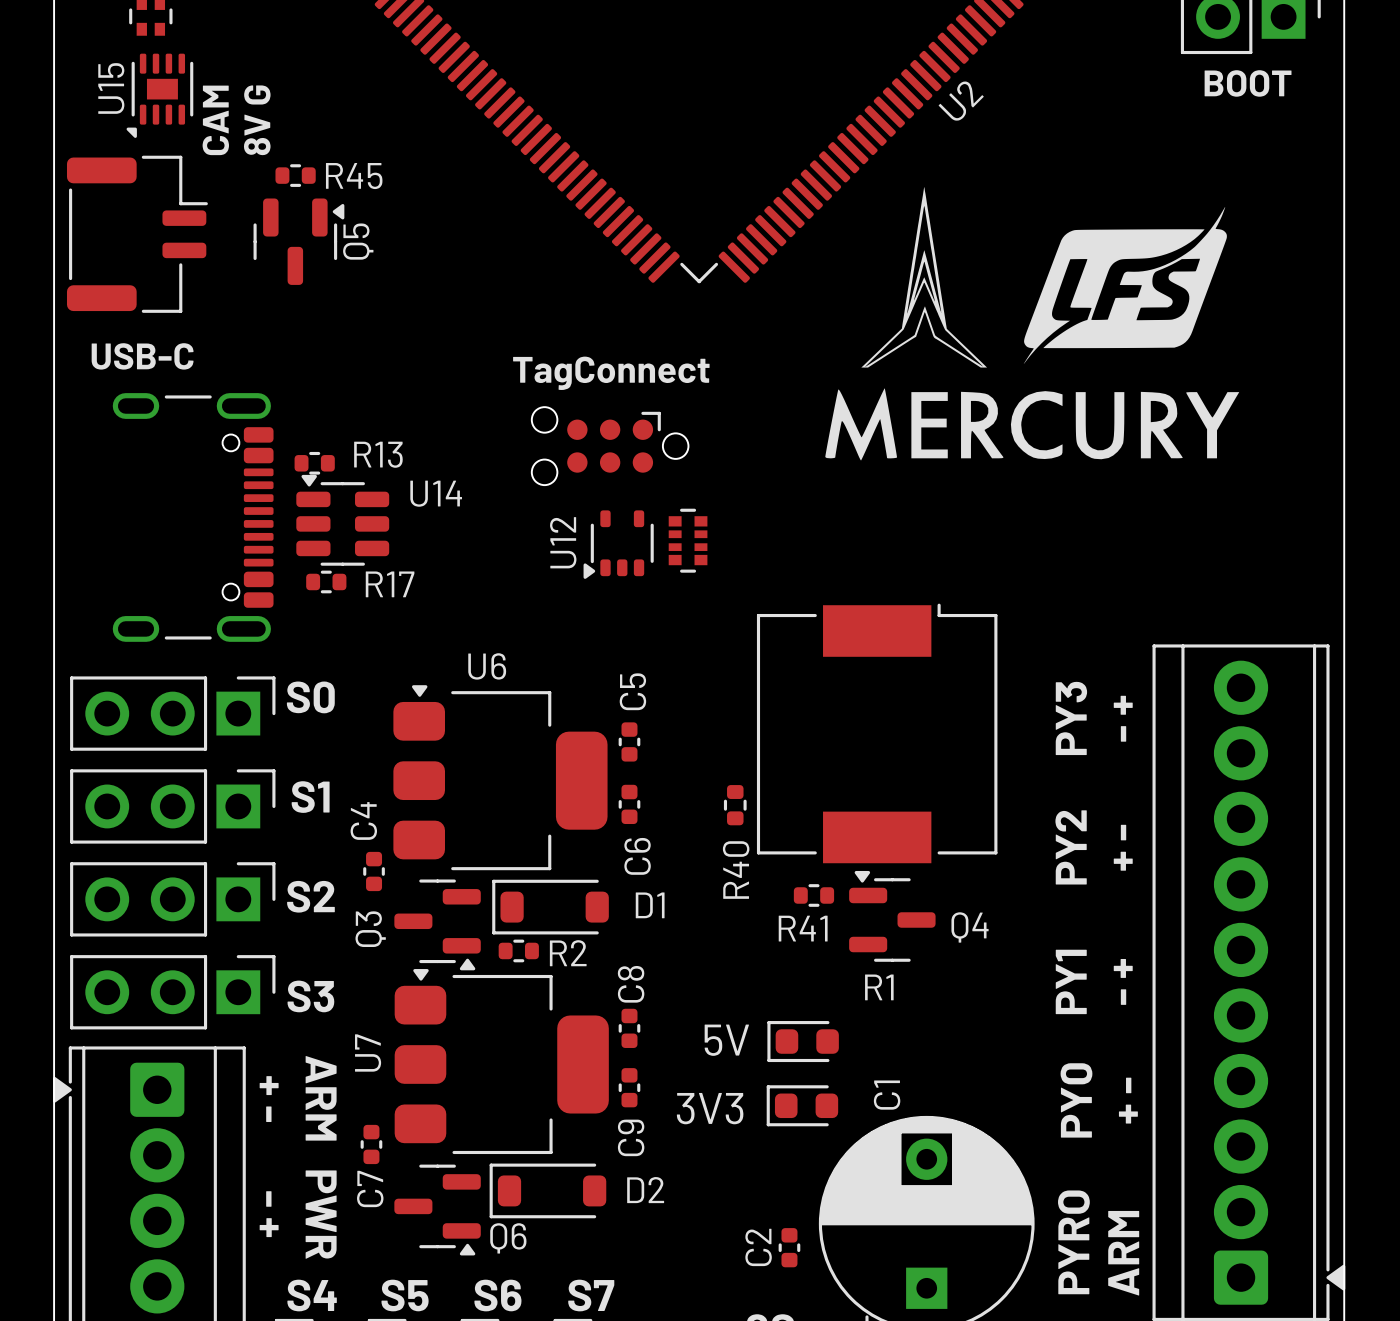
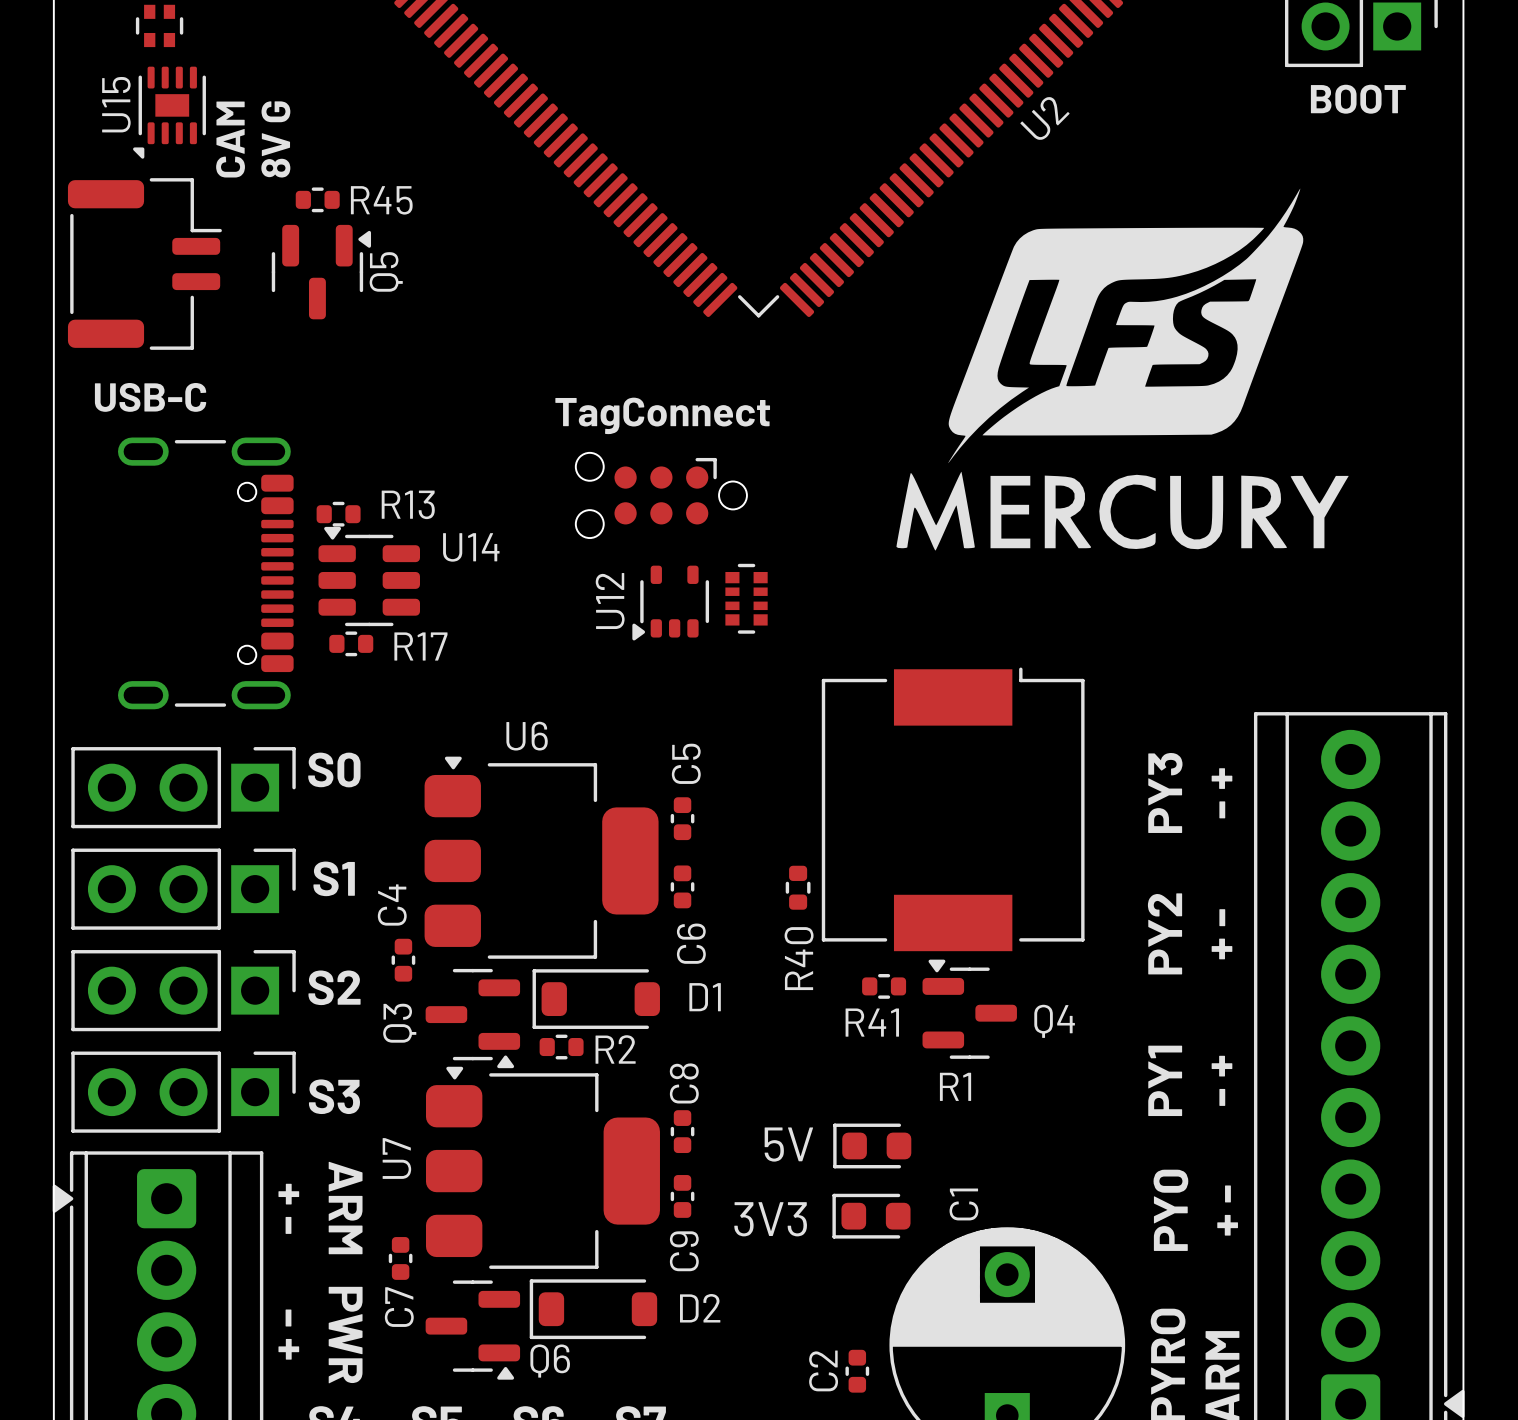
drawing: none -> [948, 188, 1304, 464]
drawing: [861, 187, 988, 368] -> none
drawing: [1023, 206, 1227, 364] -> none
drawing position: (1032, 424) -> (1122, 511)

